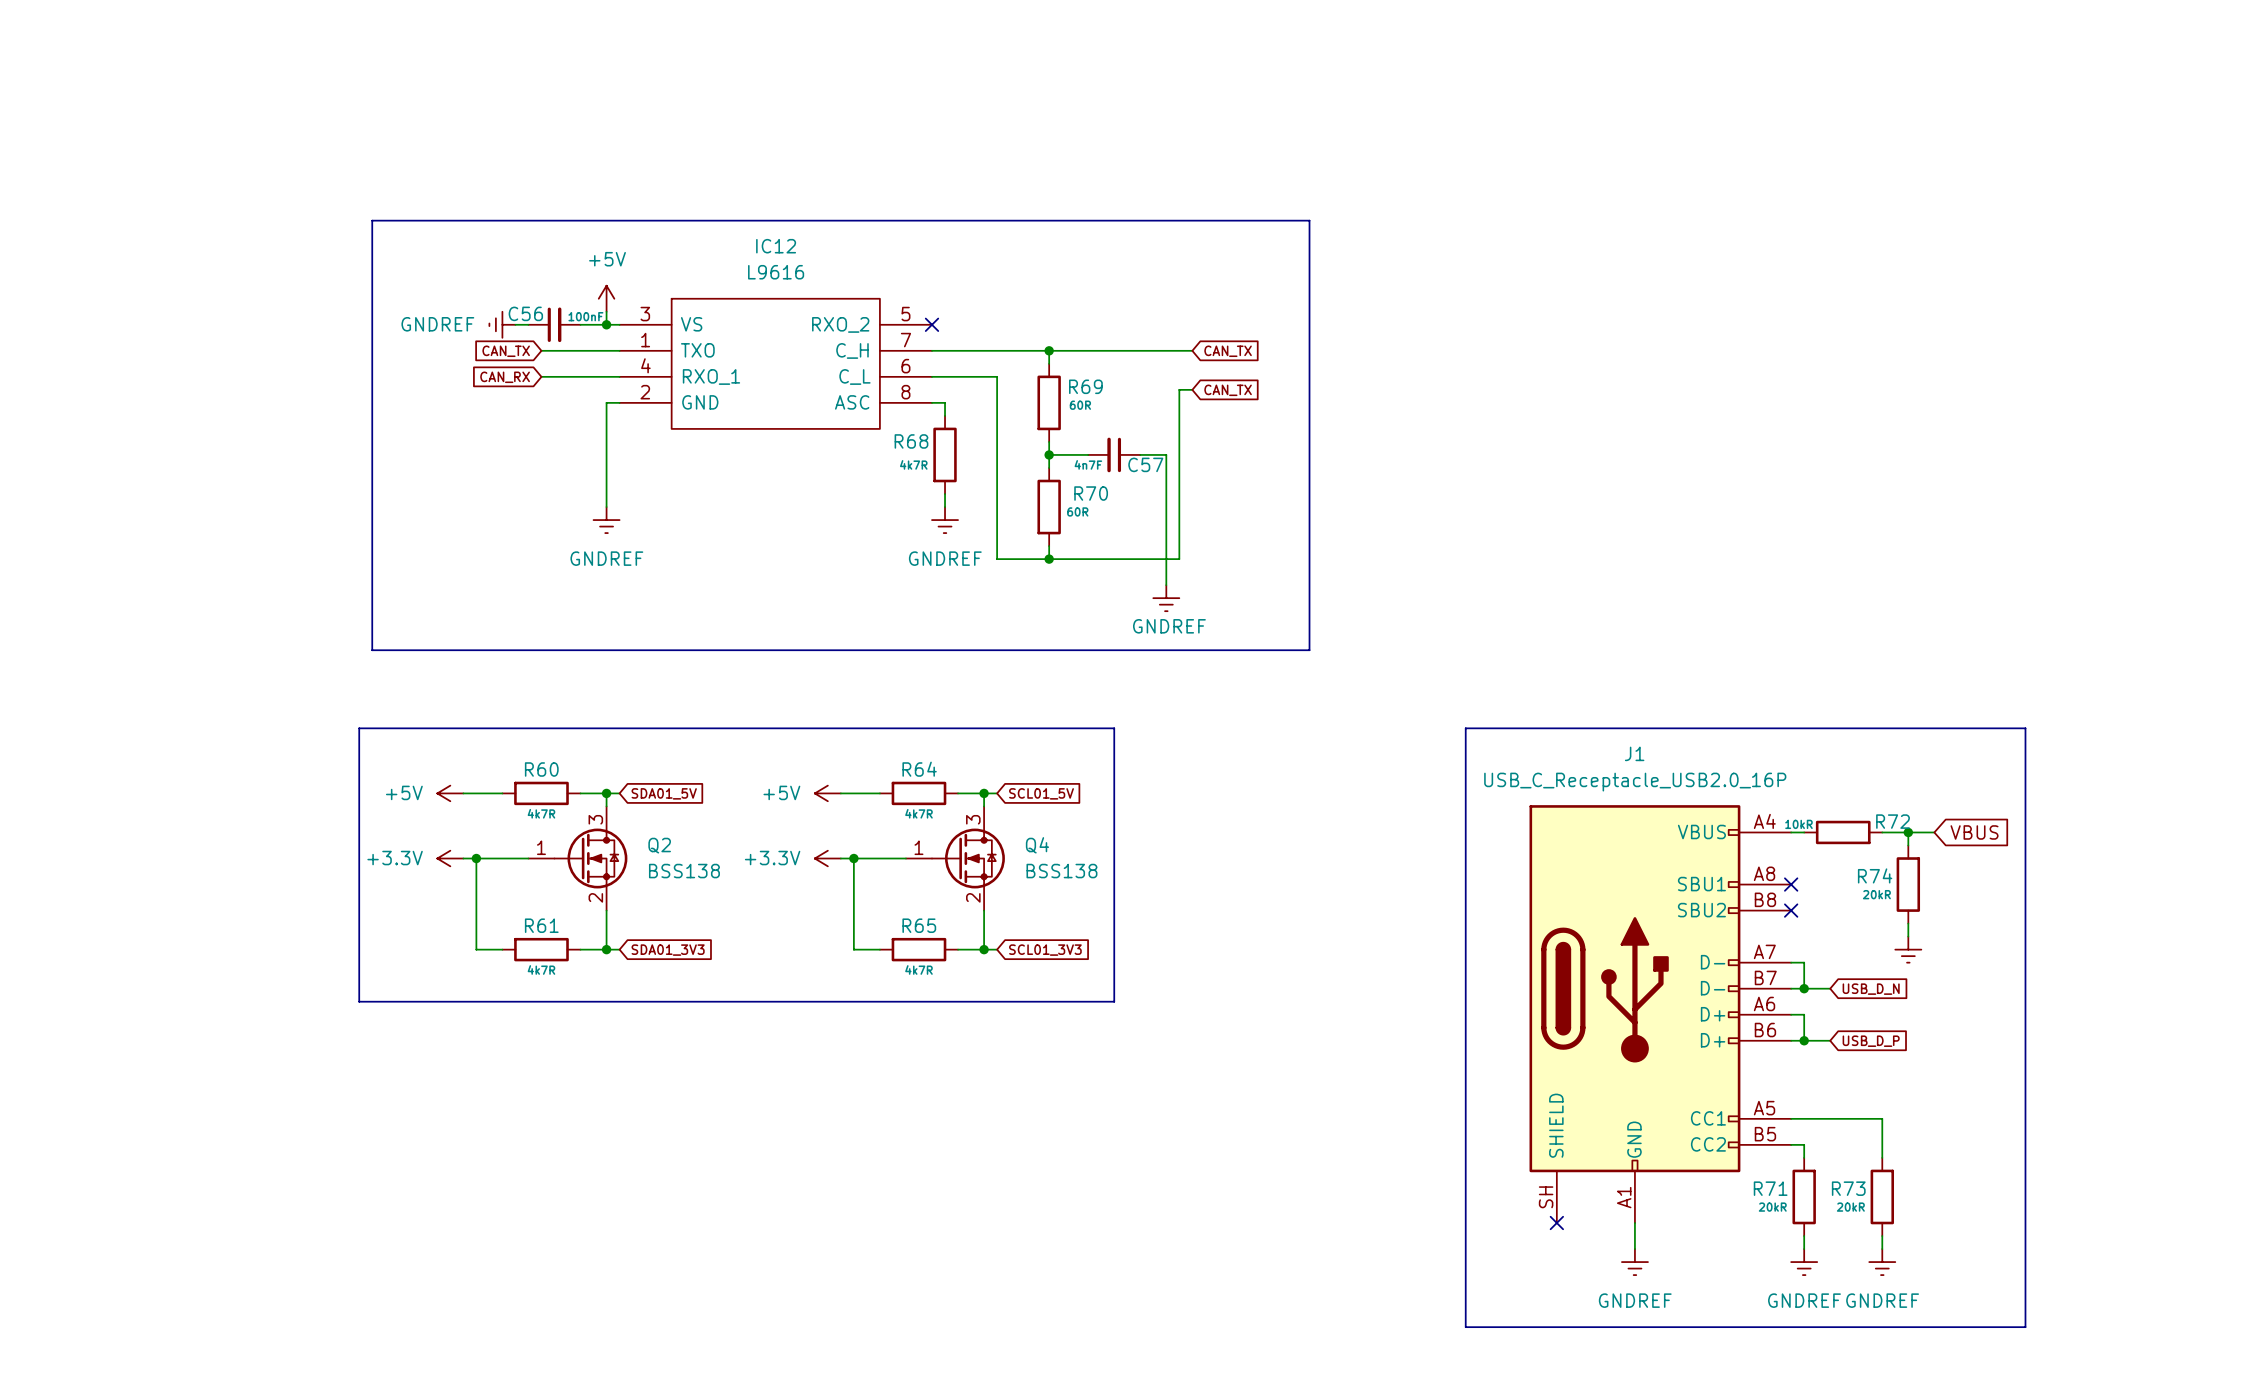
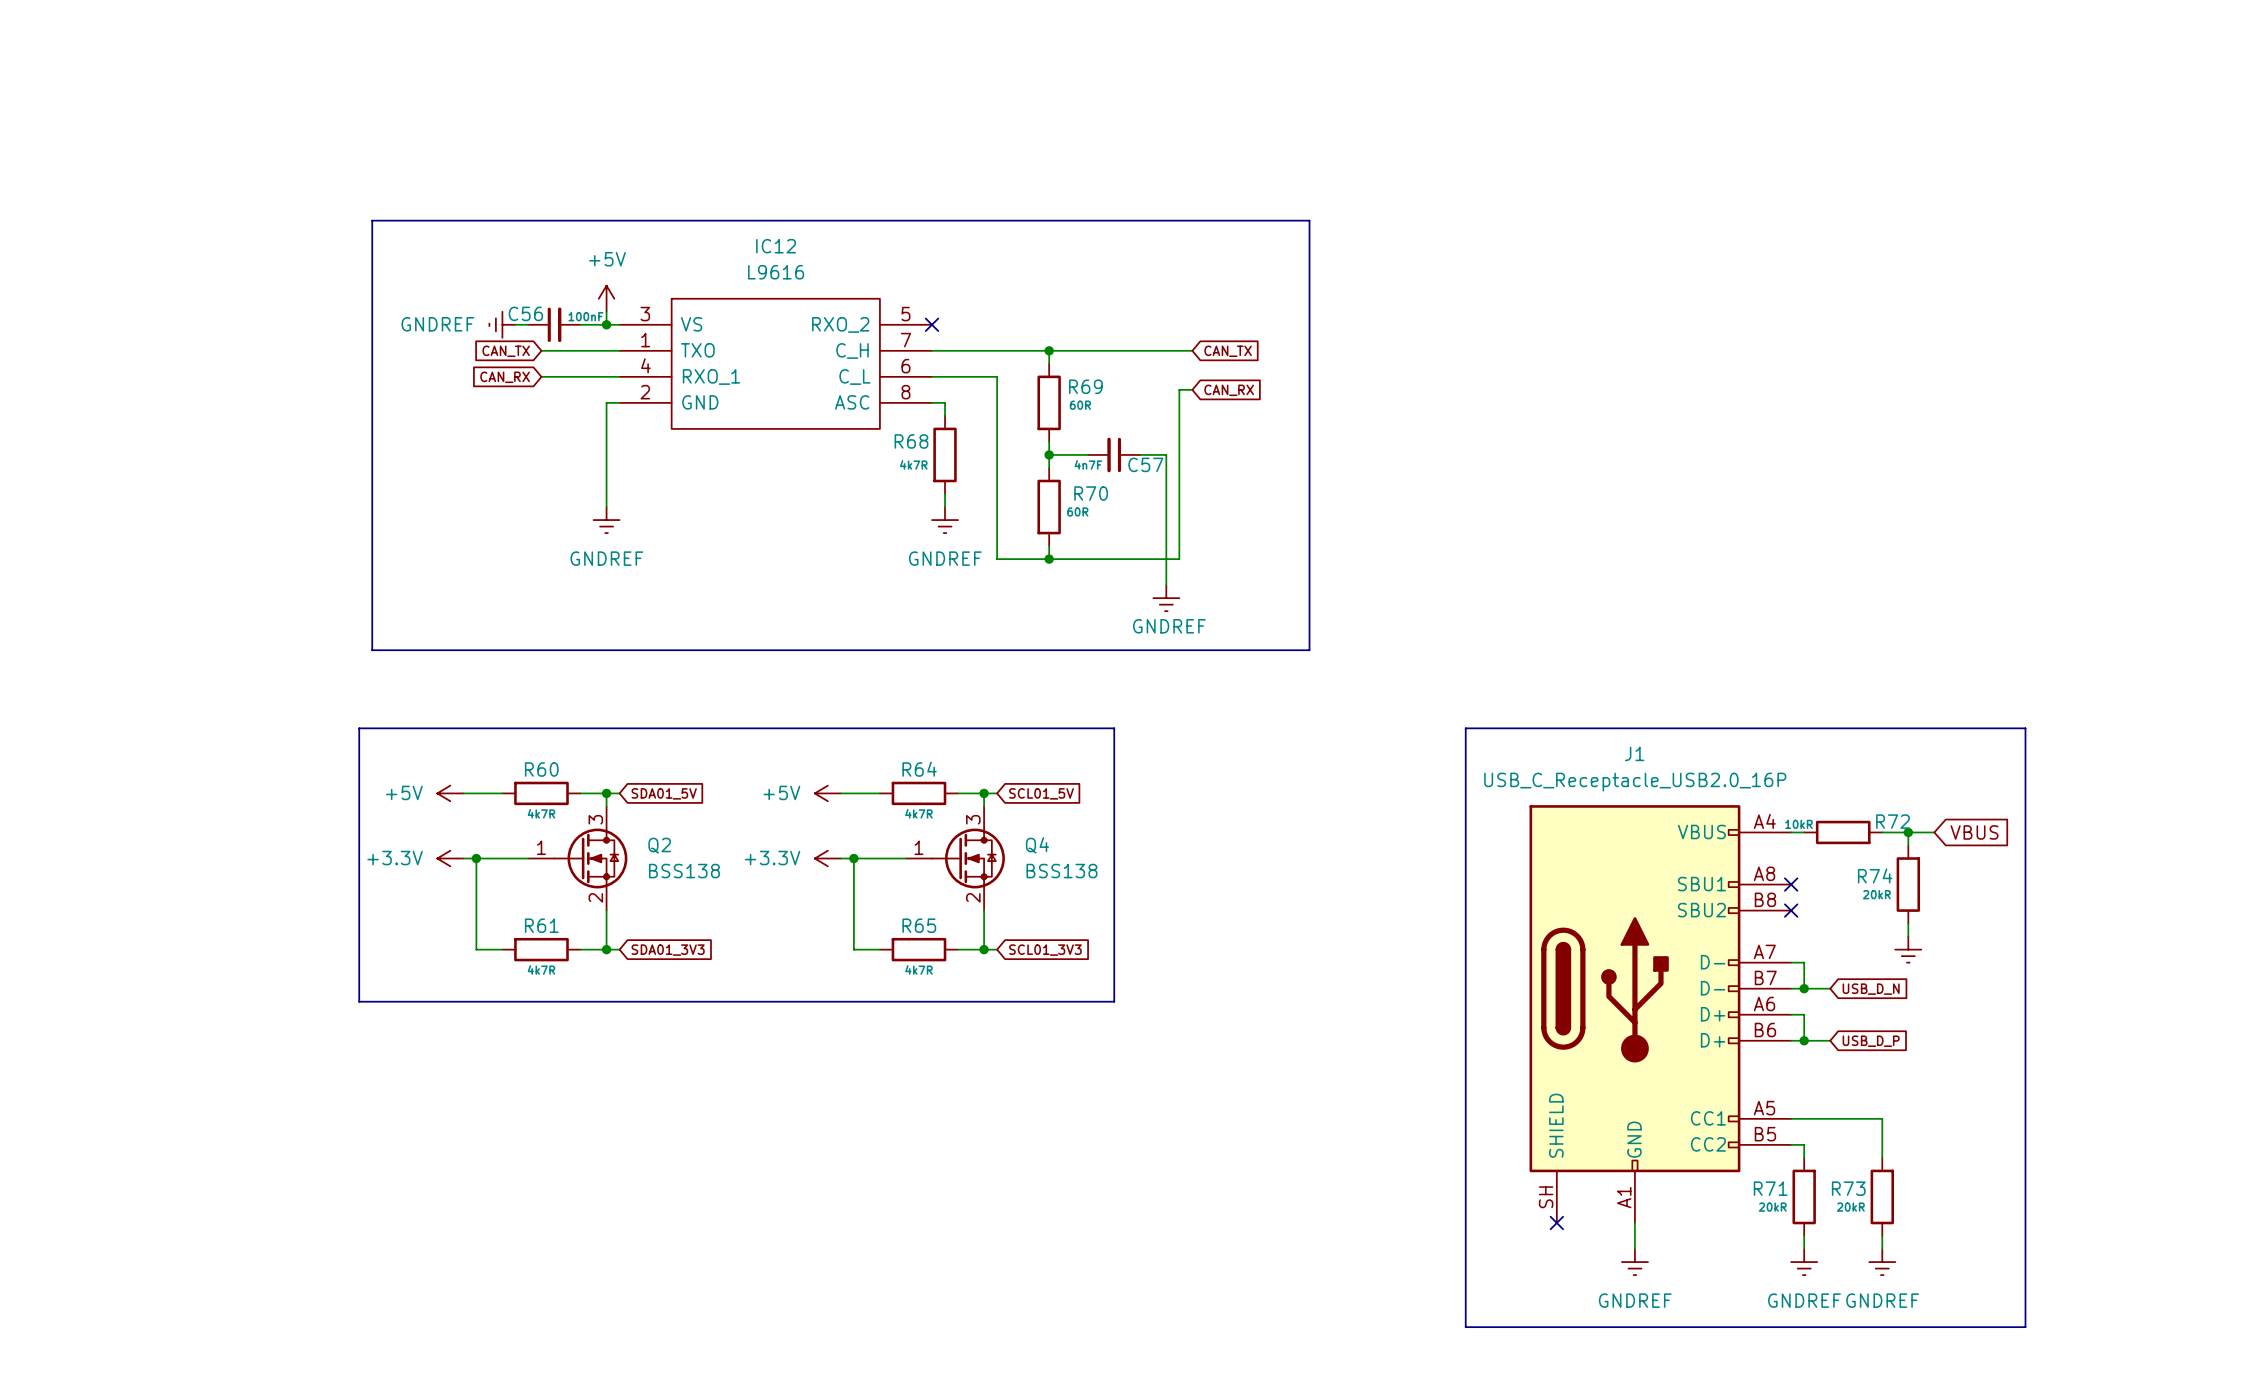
global label: CAN_TX (1228, 390) -> CAN_RX (1229, 390)

